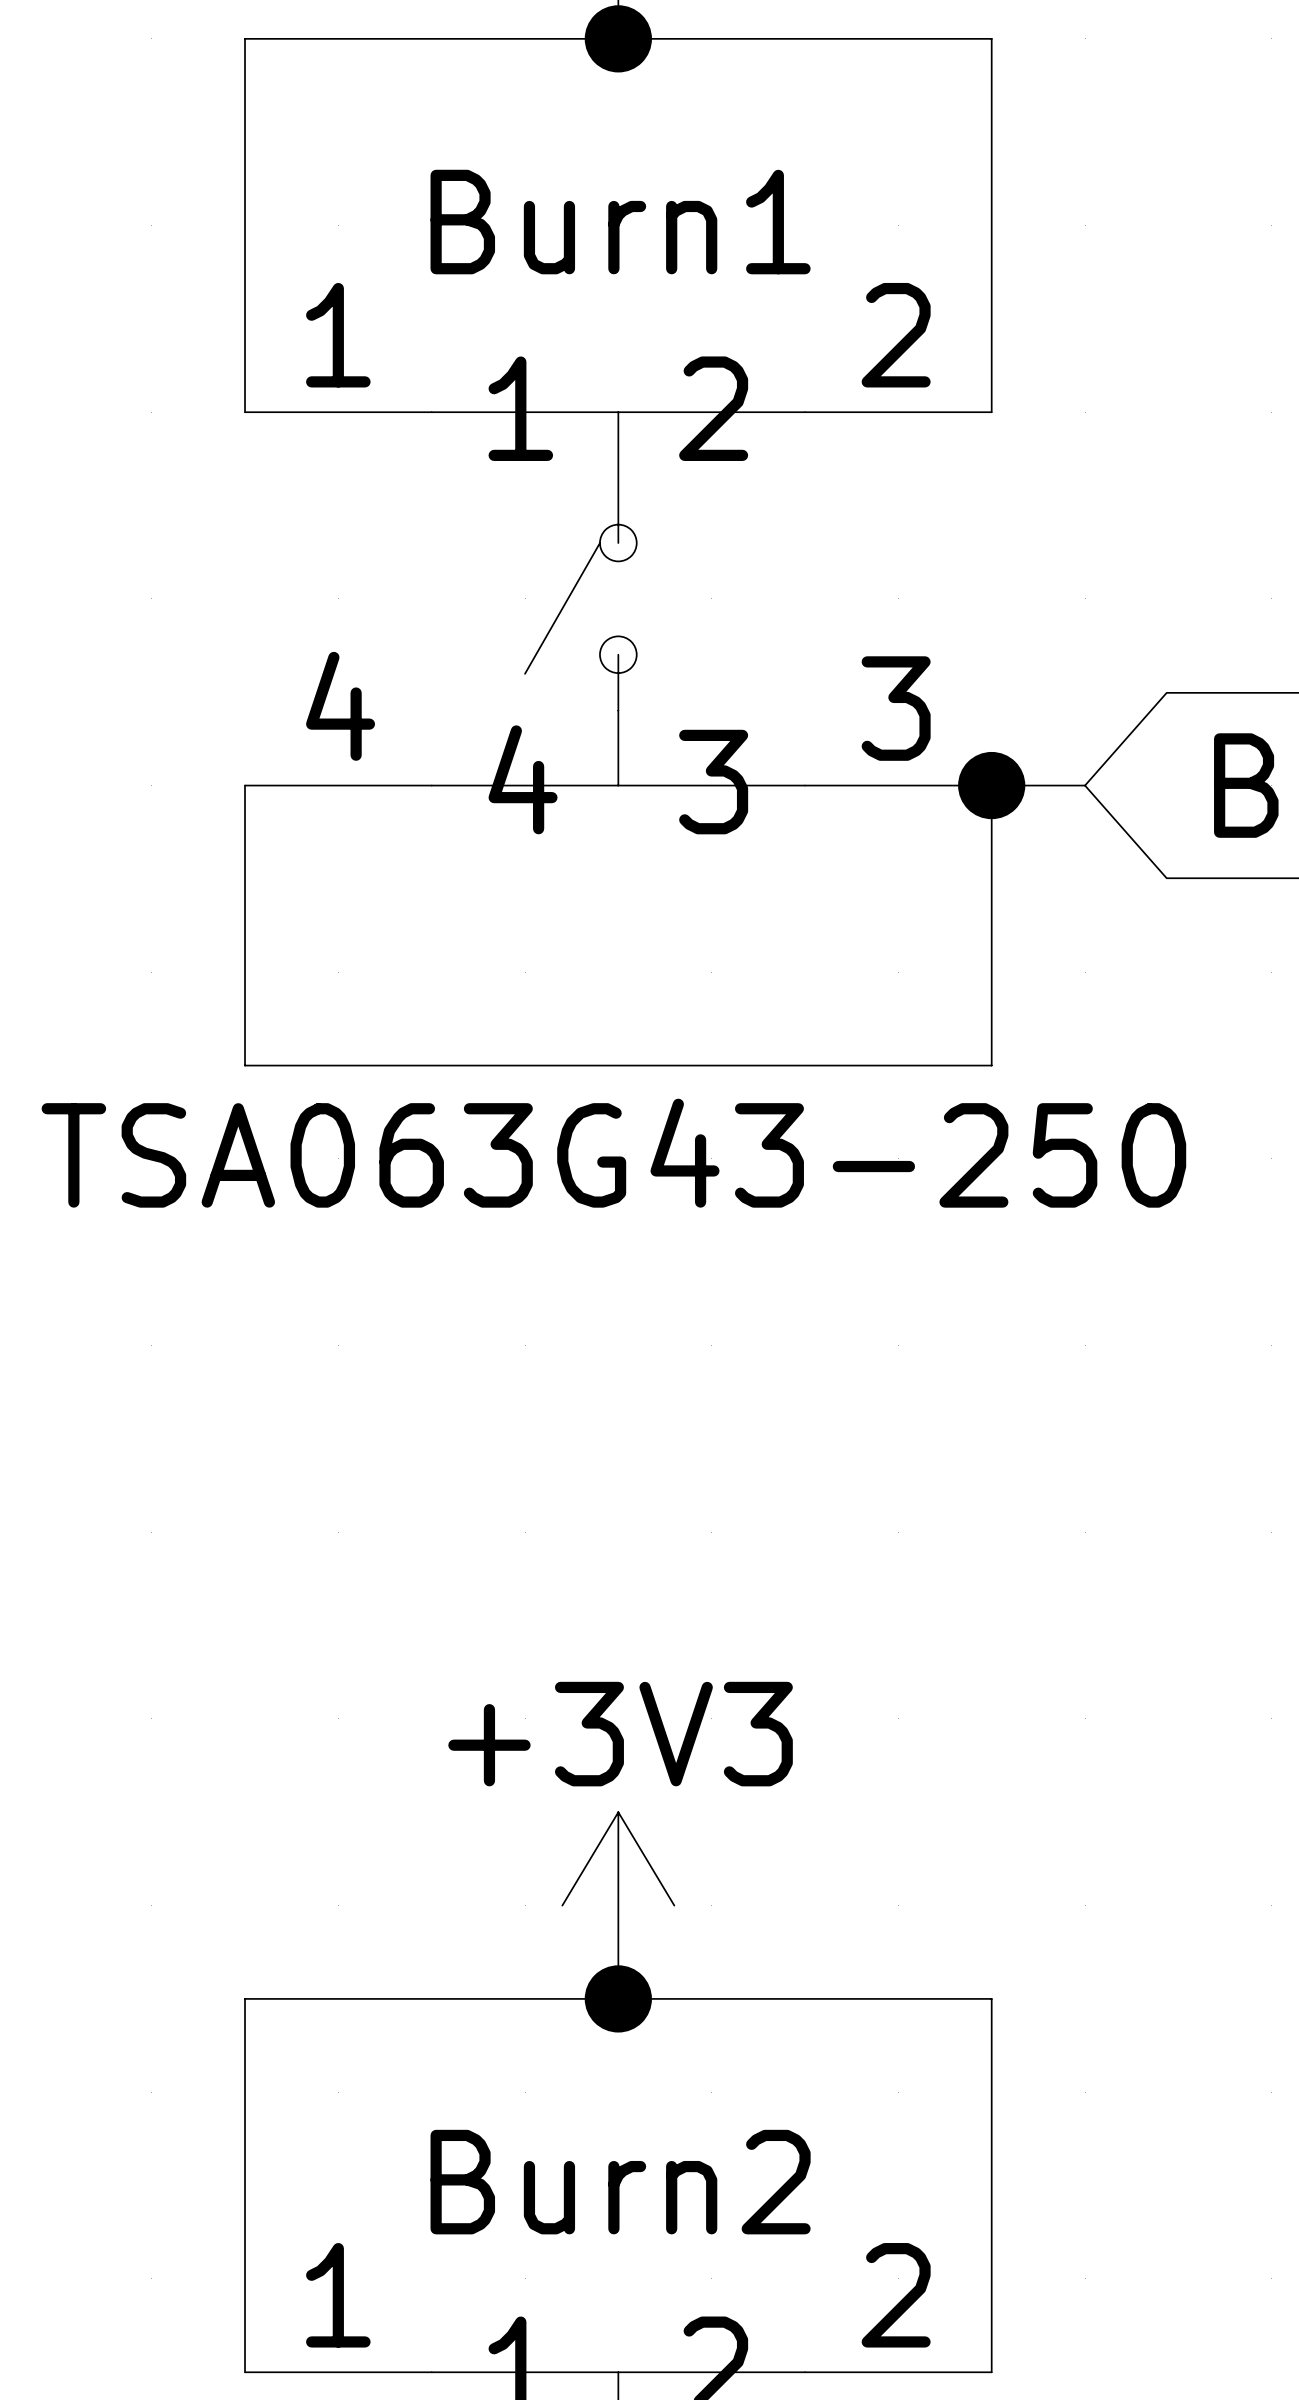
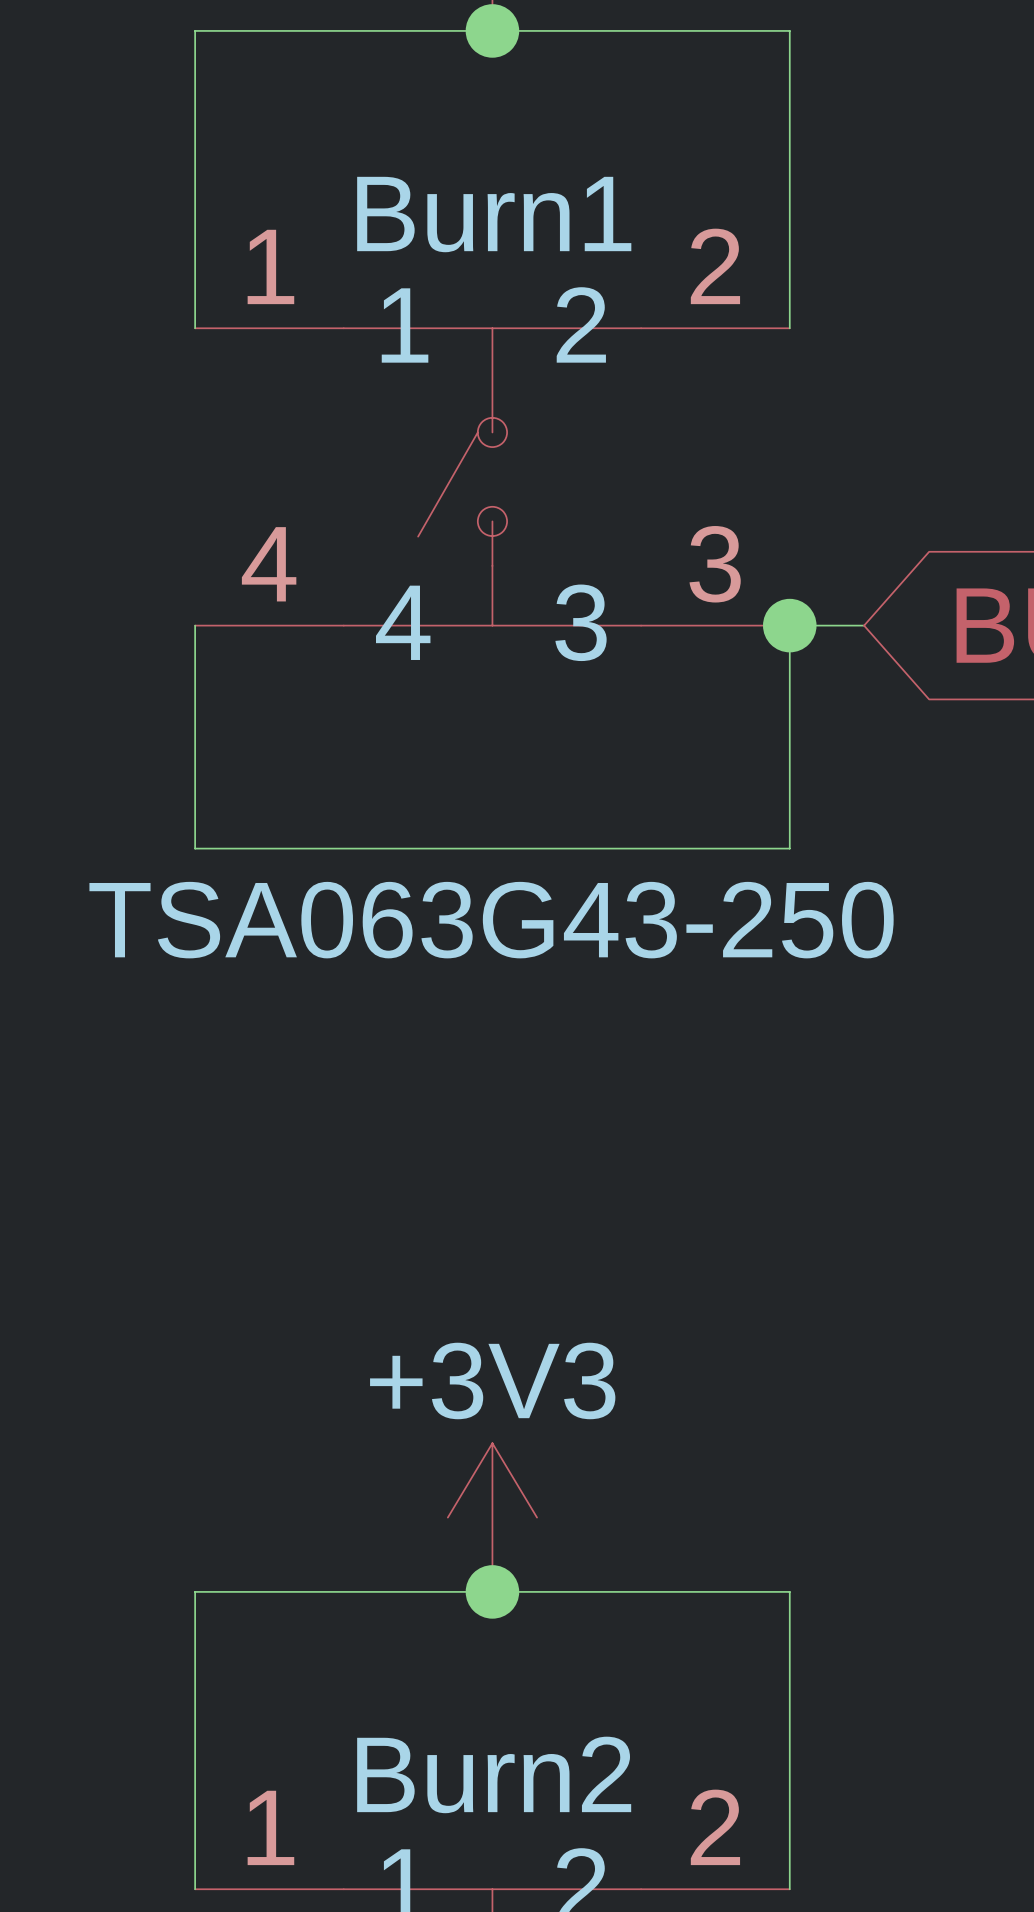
Burn1 name position: Burn1 (620, 222) -> Burn1 (494, 214)
Burn2 name position: Burn2 (620, 2182) -> Burn2 (494, 1774)

